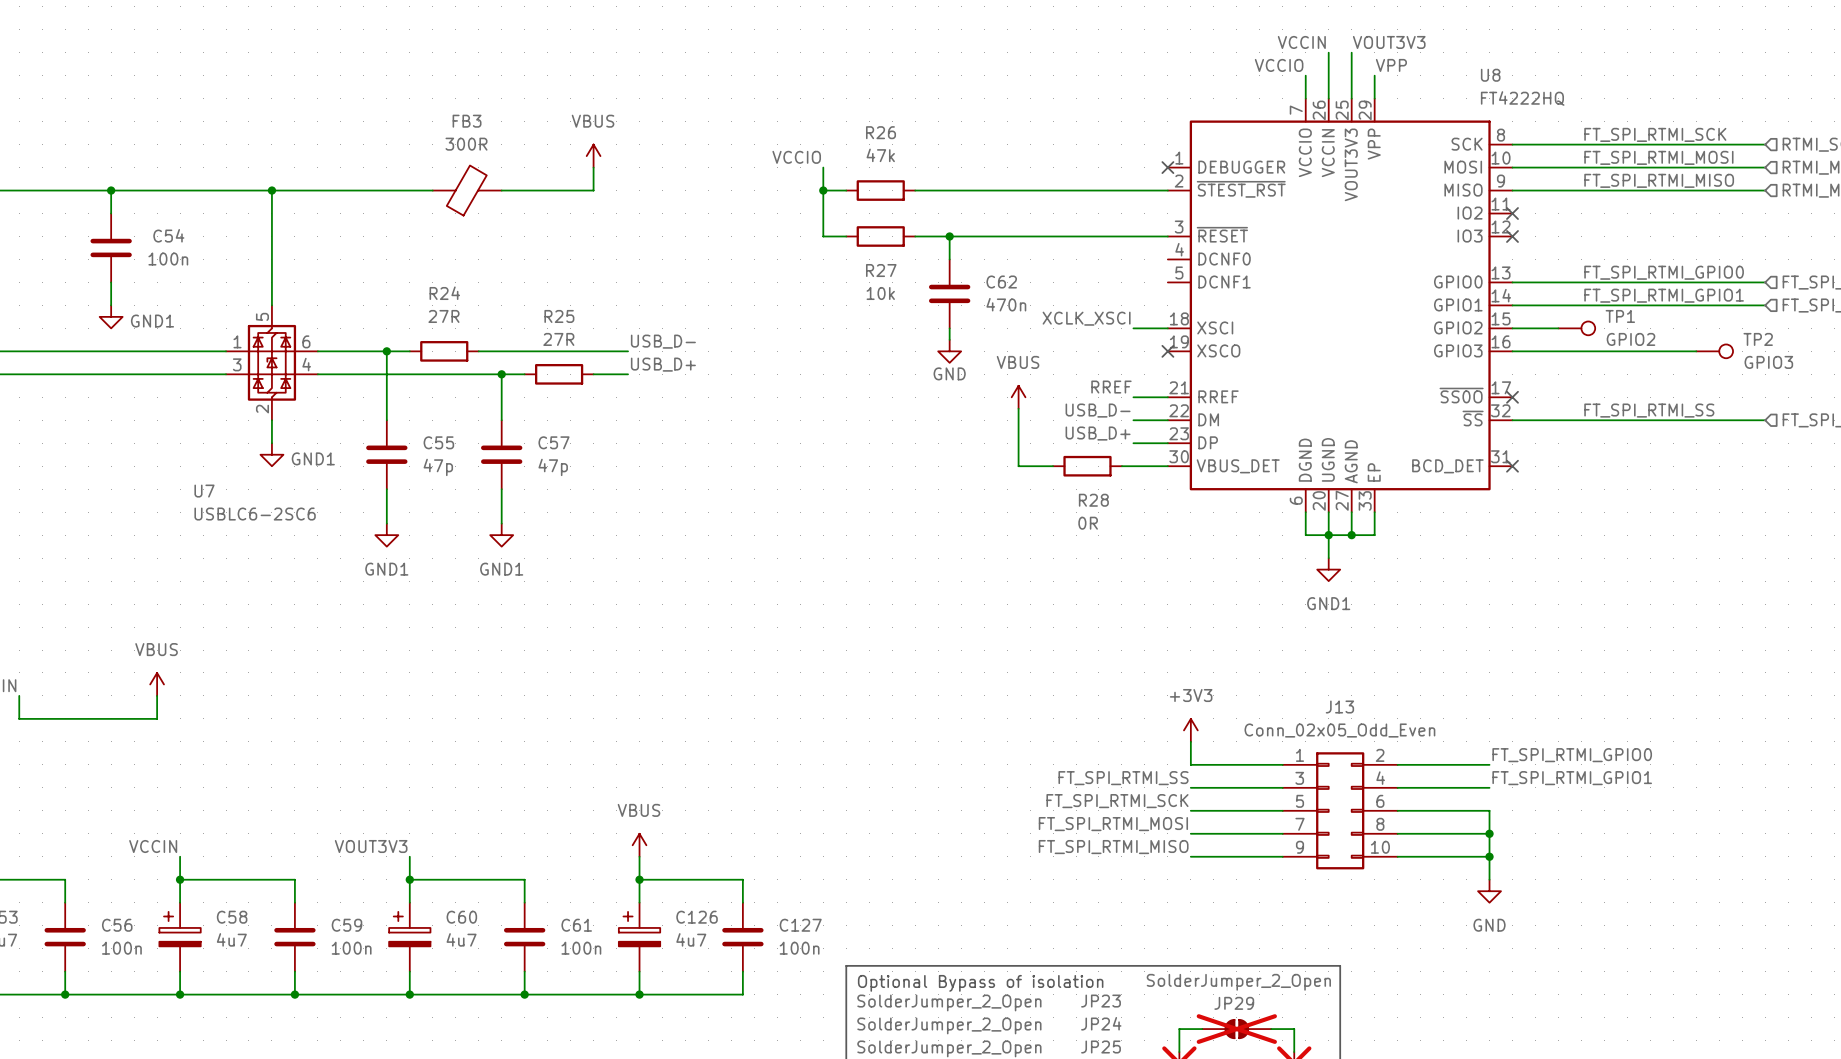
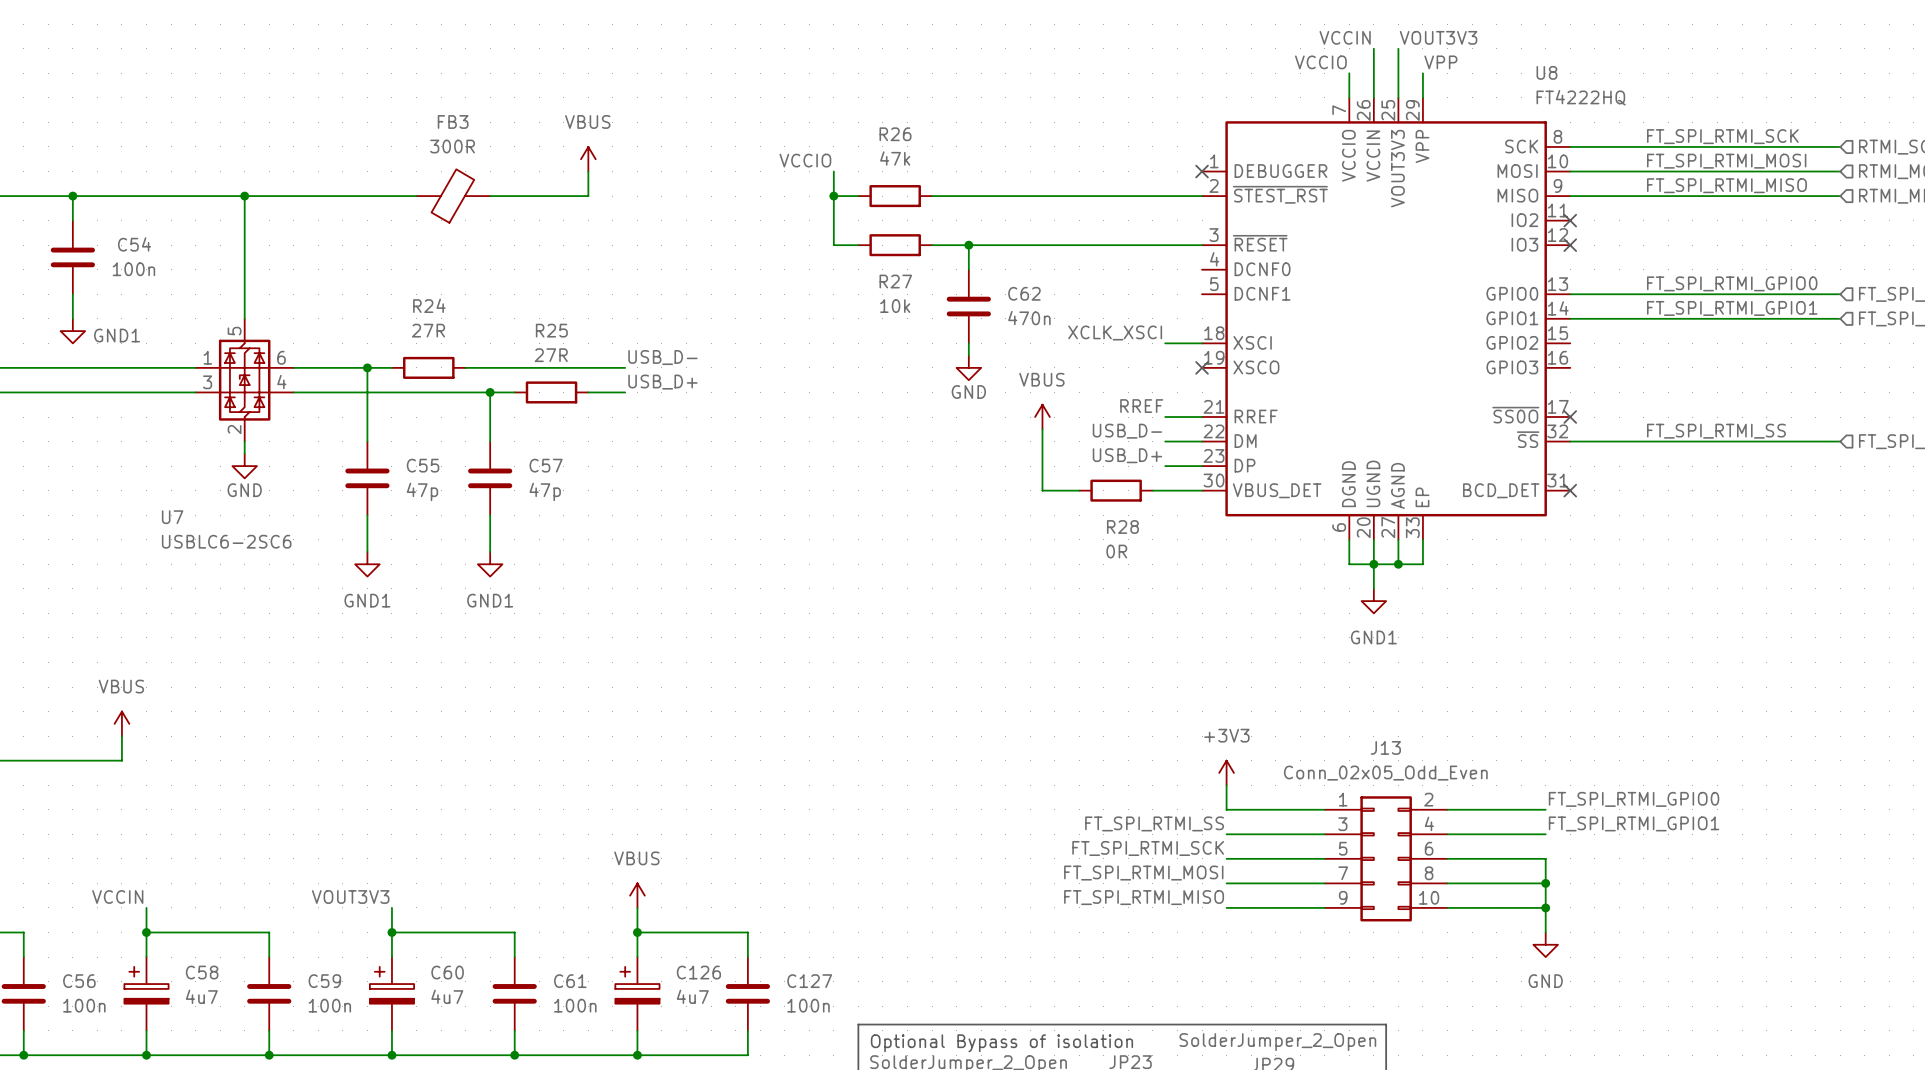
wire: (1512, 328) (1558, 328) -> none
TP1: GPIO2 (1576, 328) -> none
wire: (1512, 351) (1696, 351) -> none
TP2: GPIO3 (1714, 351) -> none
power symbol: none -> GND (244, 466)
power symbol: GND1 (271, 454) -> none

